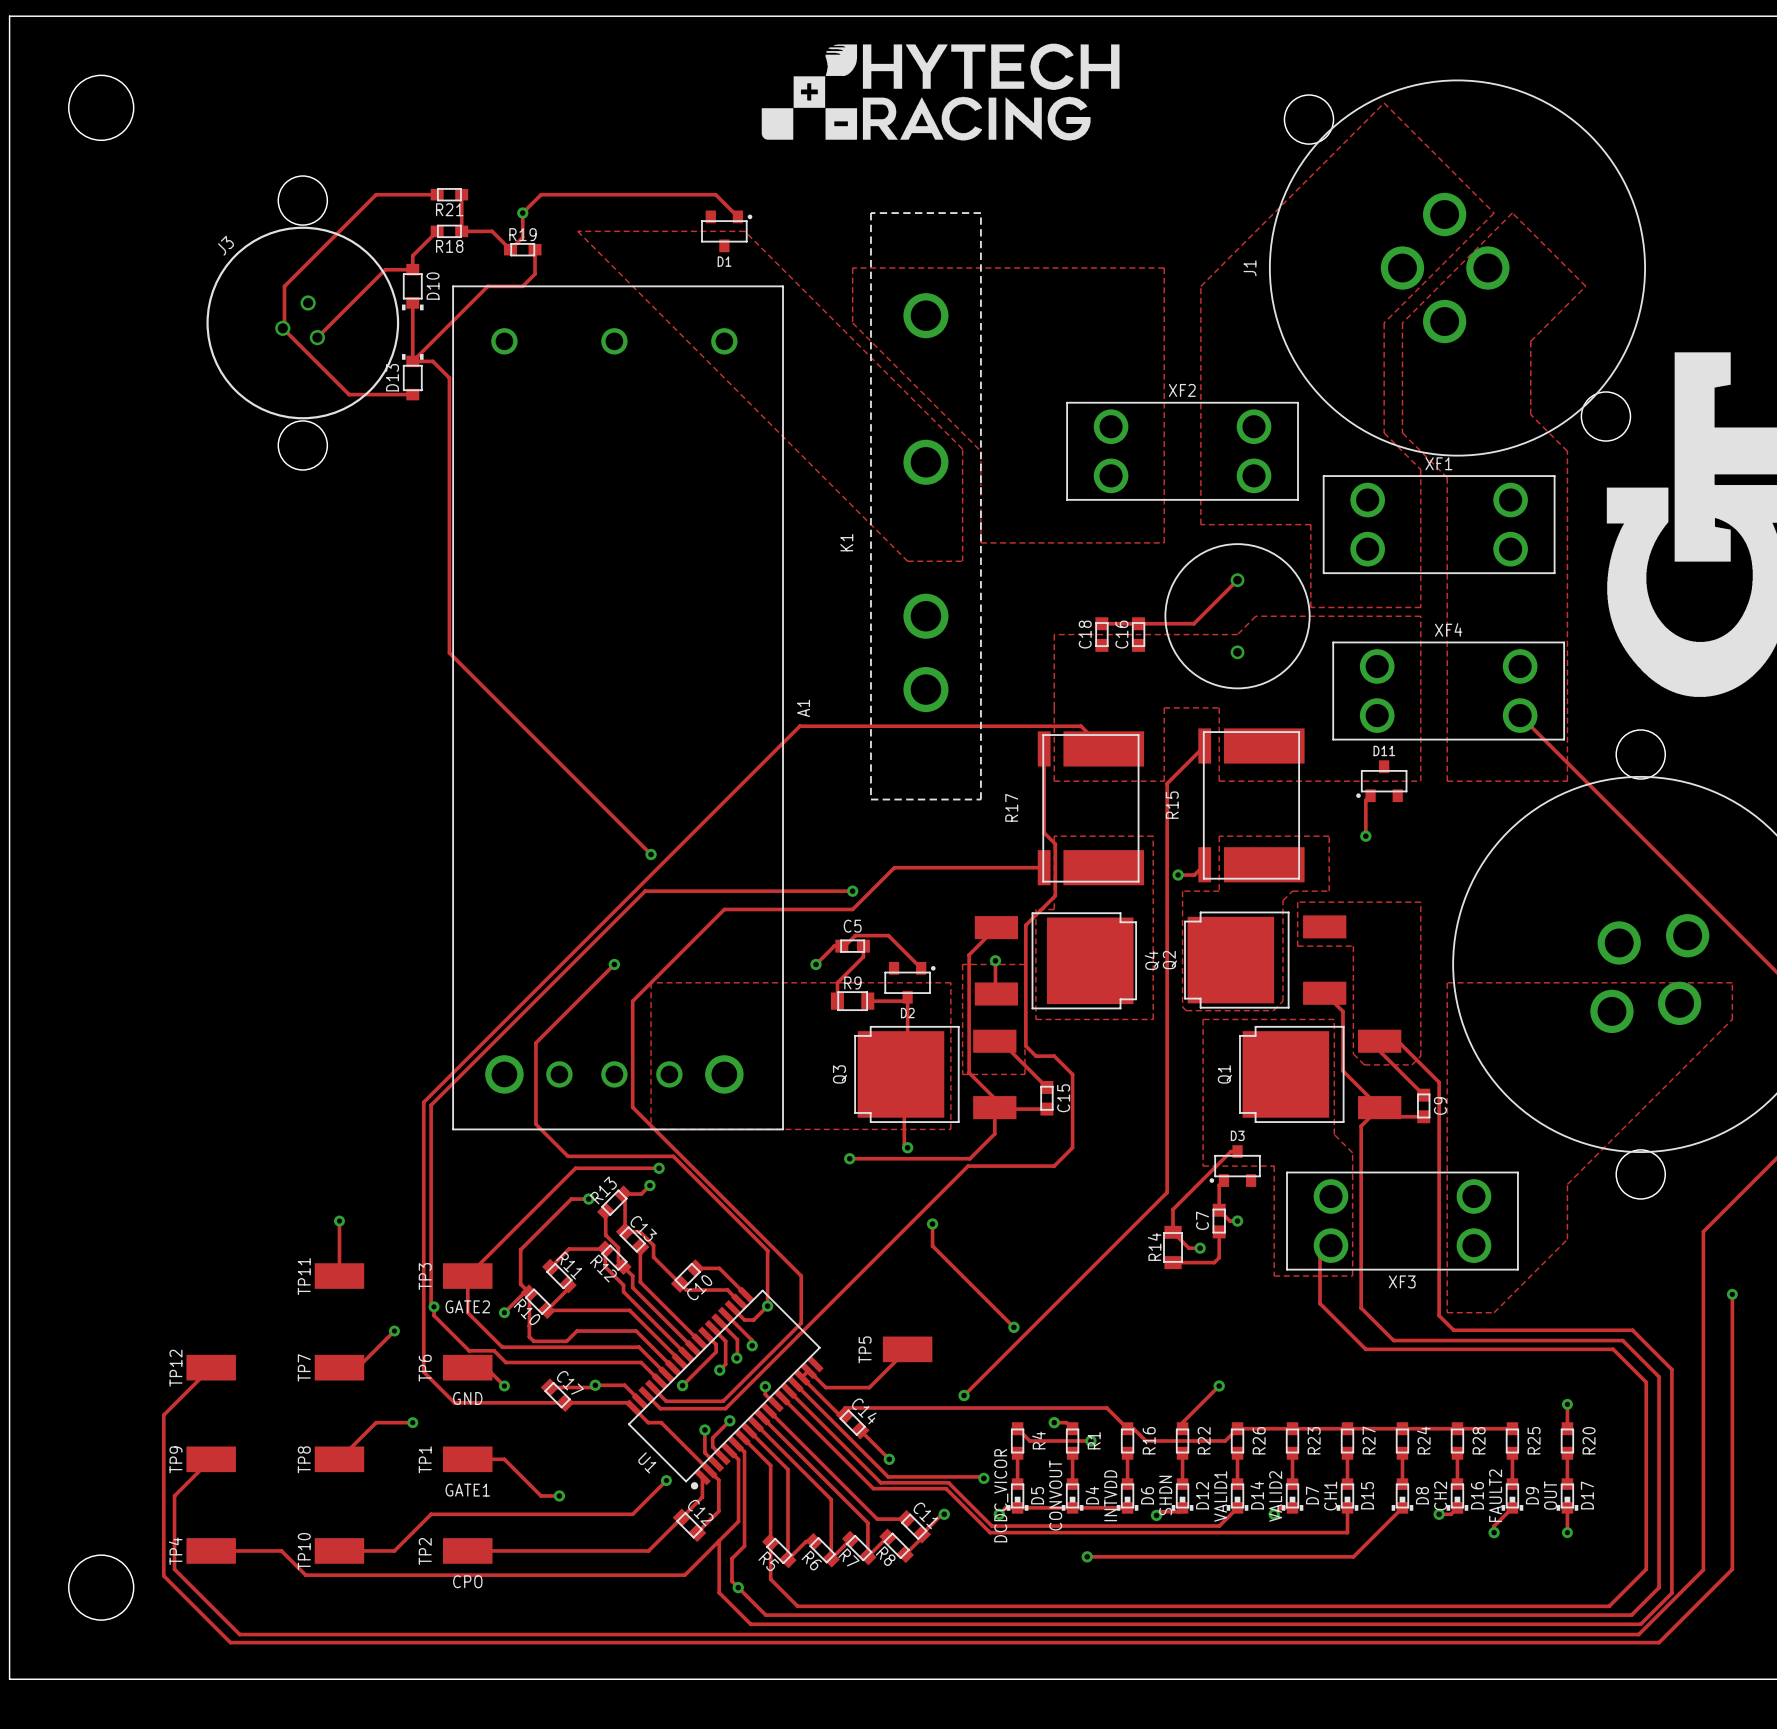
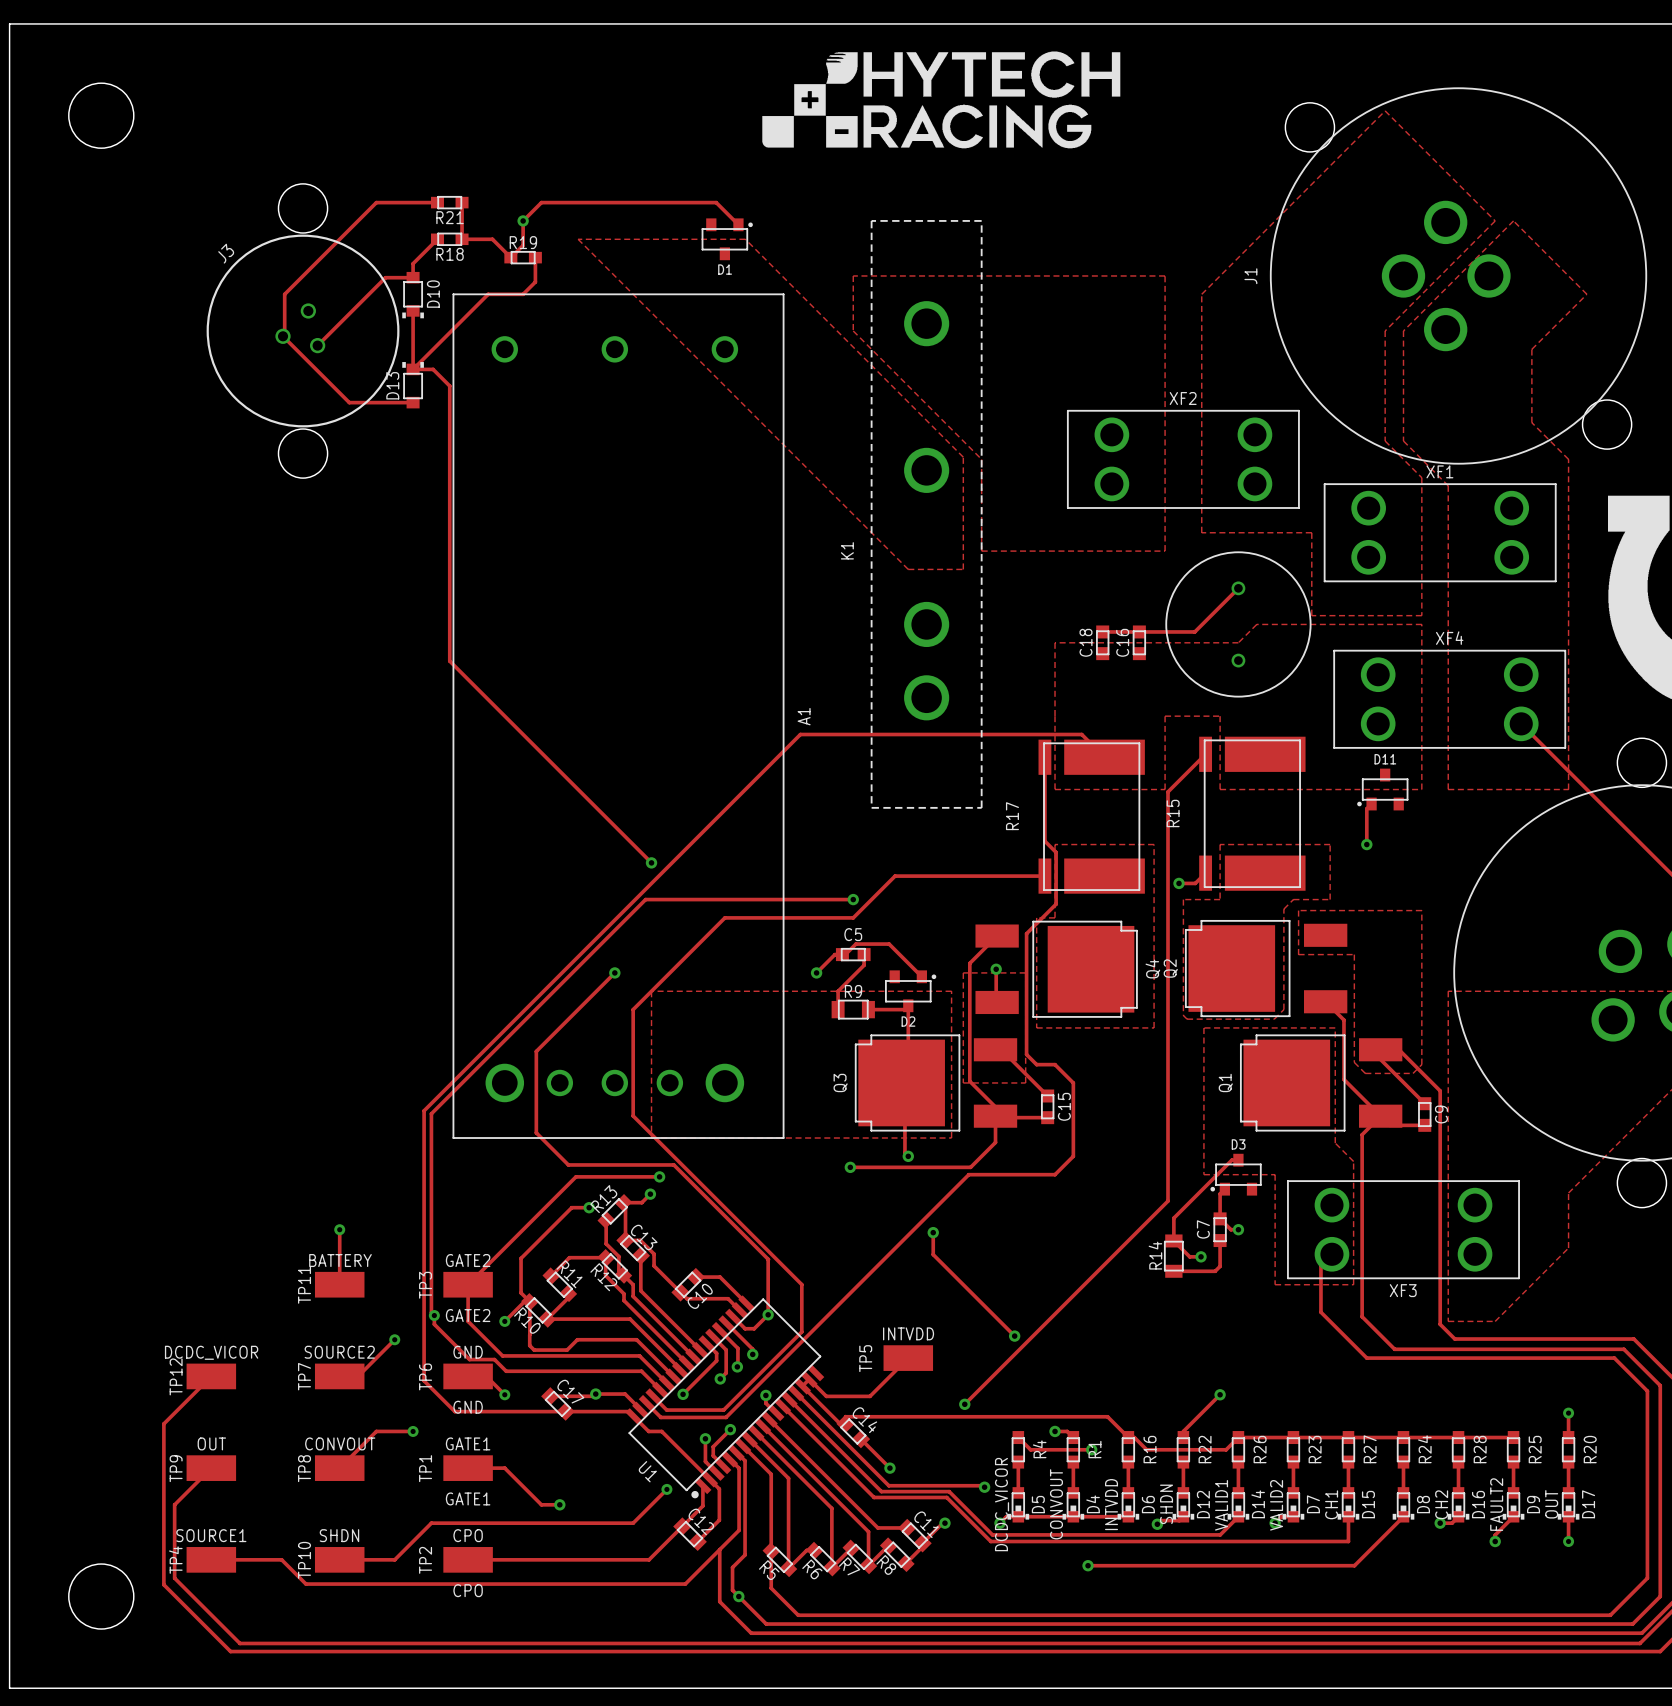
TP11 text: none -> BATTERY (340, 1260)
TP3 text: none -> GATE2 (468, 1260)
TP5 text: none -> INTVDD (908, 1333)
TP7 text: none -> SOURCE2 (339, 1352)
TP6 text: none -> GND (468, 1352)
TP12 text: none -> DCDC_VICOR (211, 1352)
TP9 text: none -> OUT (211, 1443)
TP8 text: none -> CONVOUT (340, 1443)
TP1 text: none -> GATE1 (468, 1443)
TP4 text: none -> SOURCE1 (211, 1535)
TP10 text: none -> SHDN (339, 1535)
TP2 text: none -> CPO (468, 1535)

